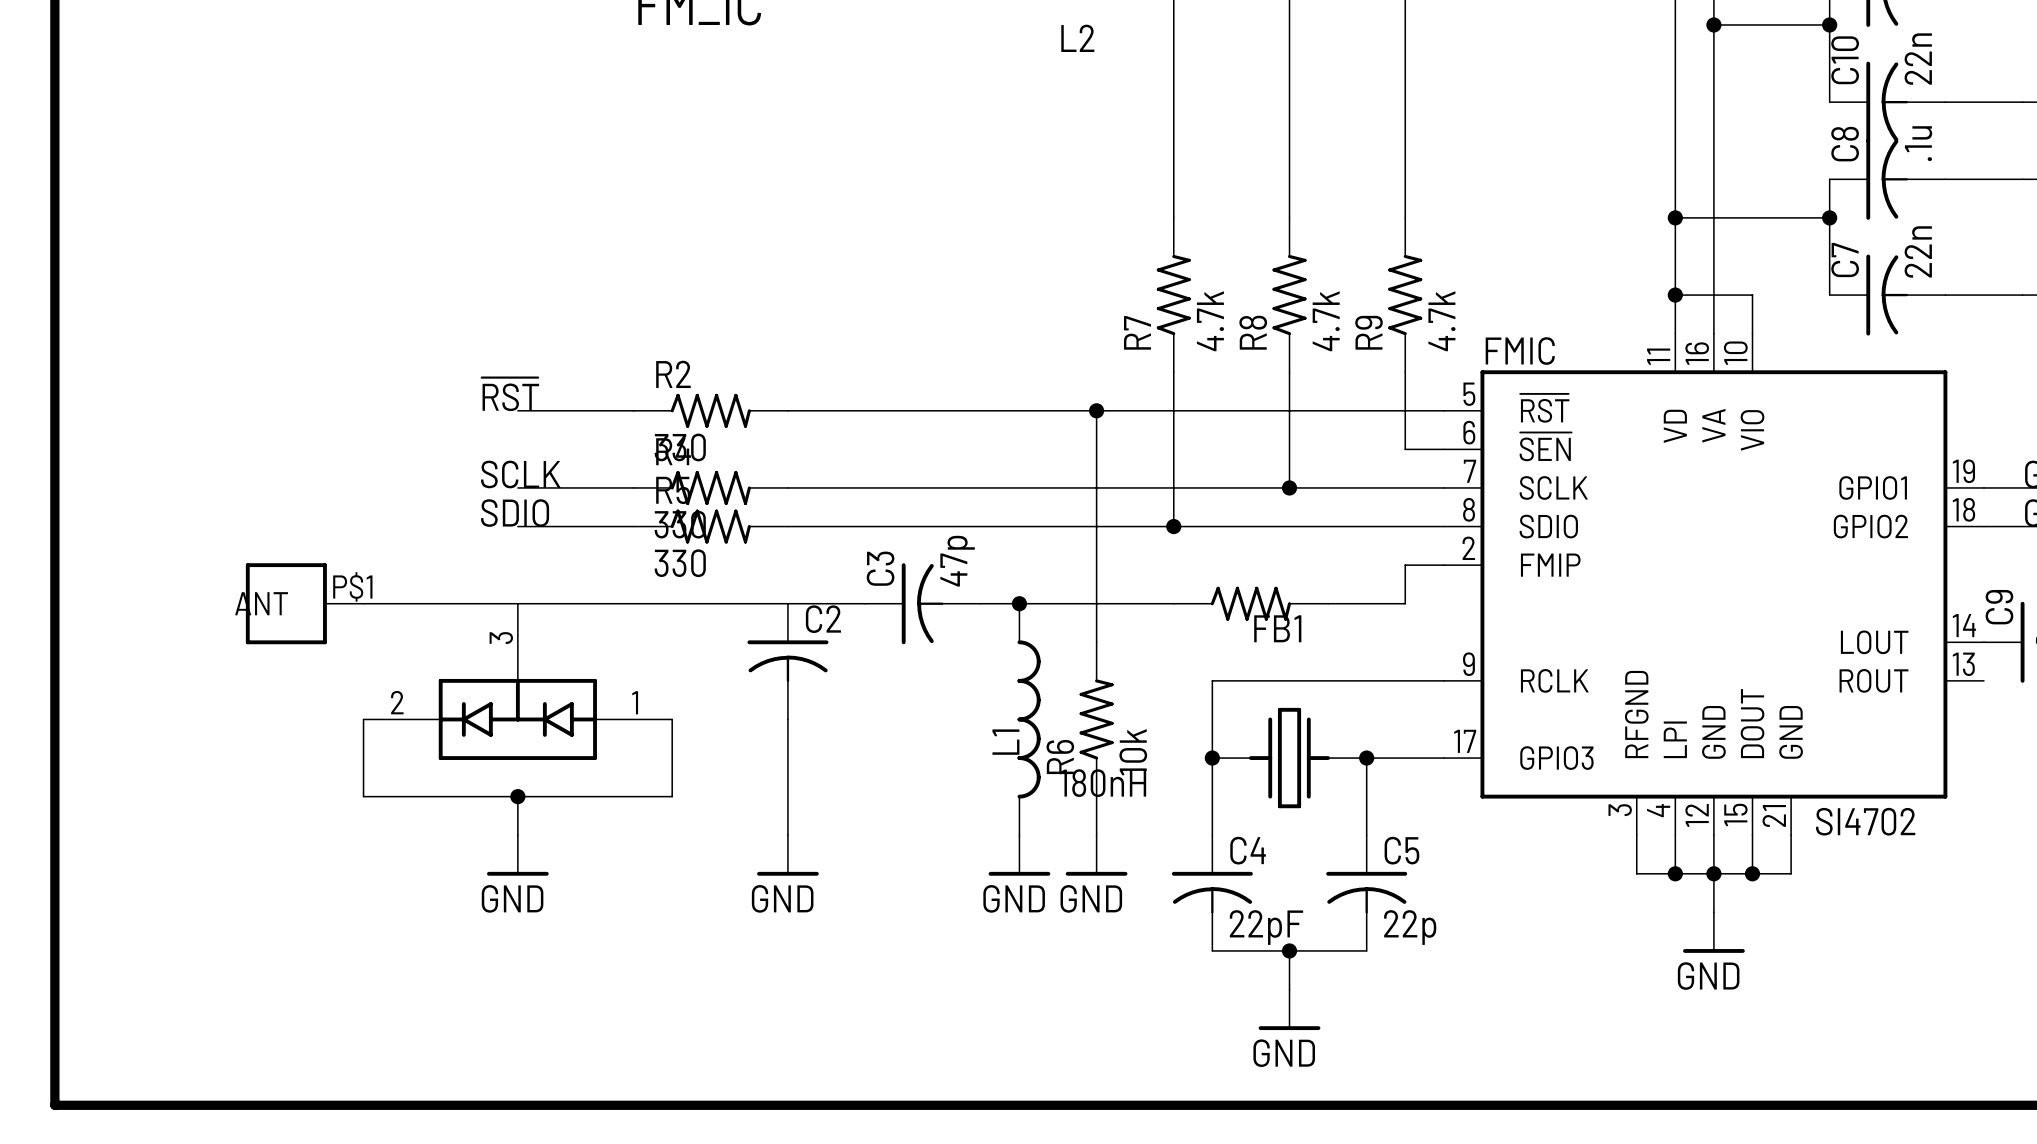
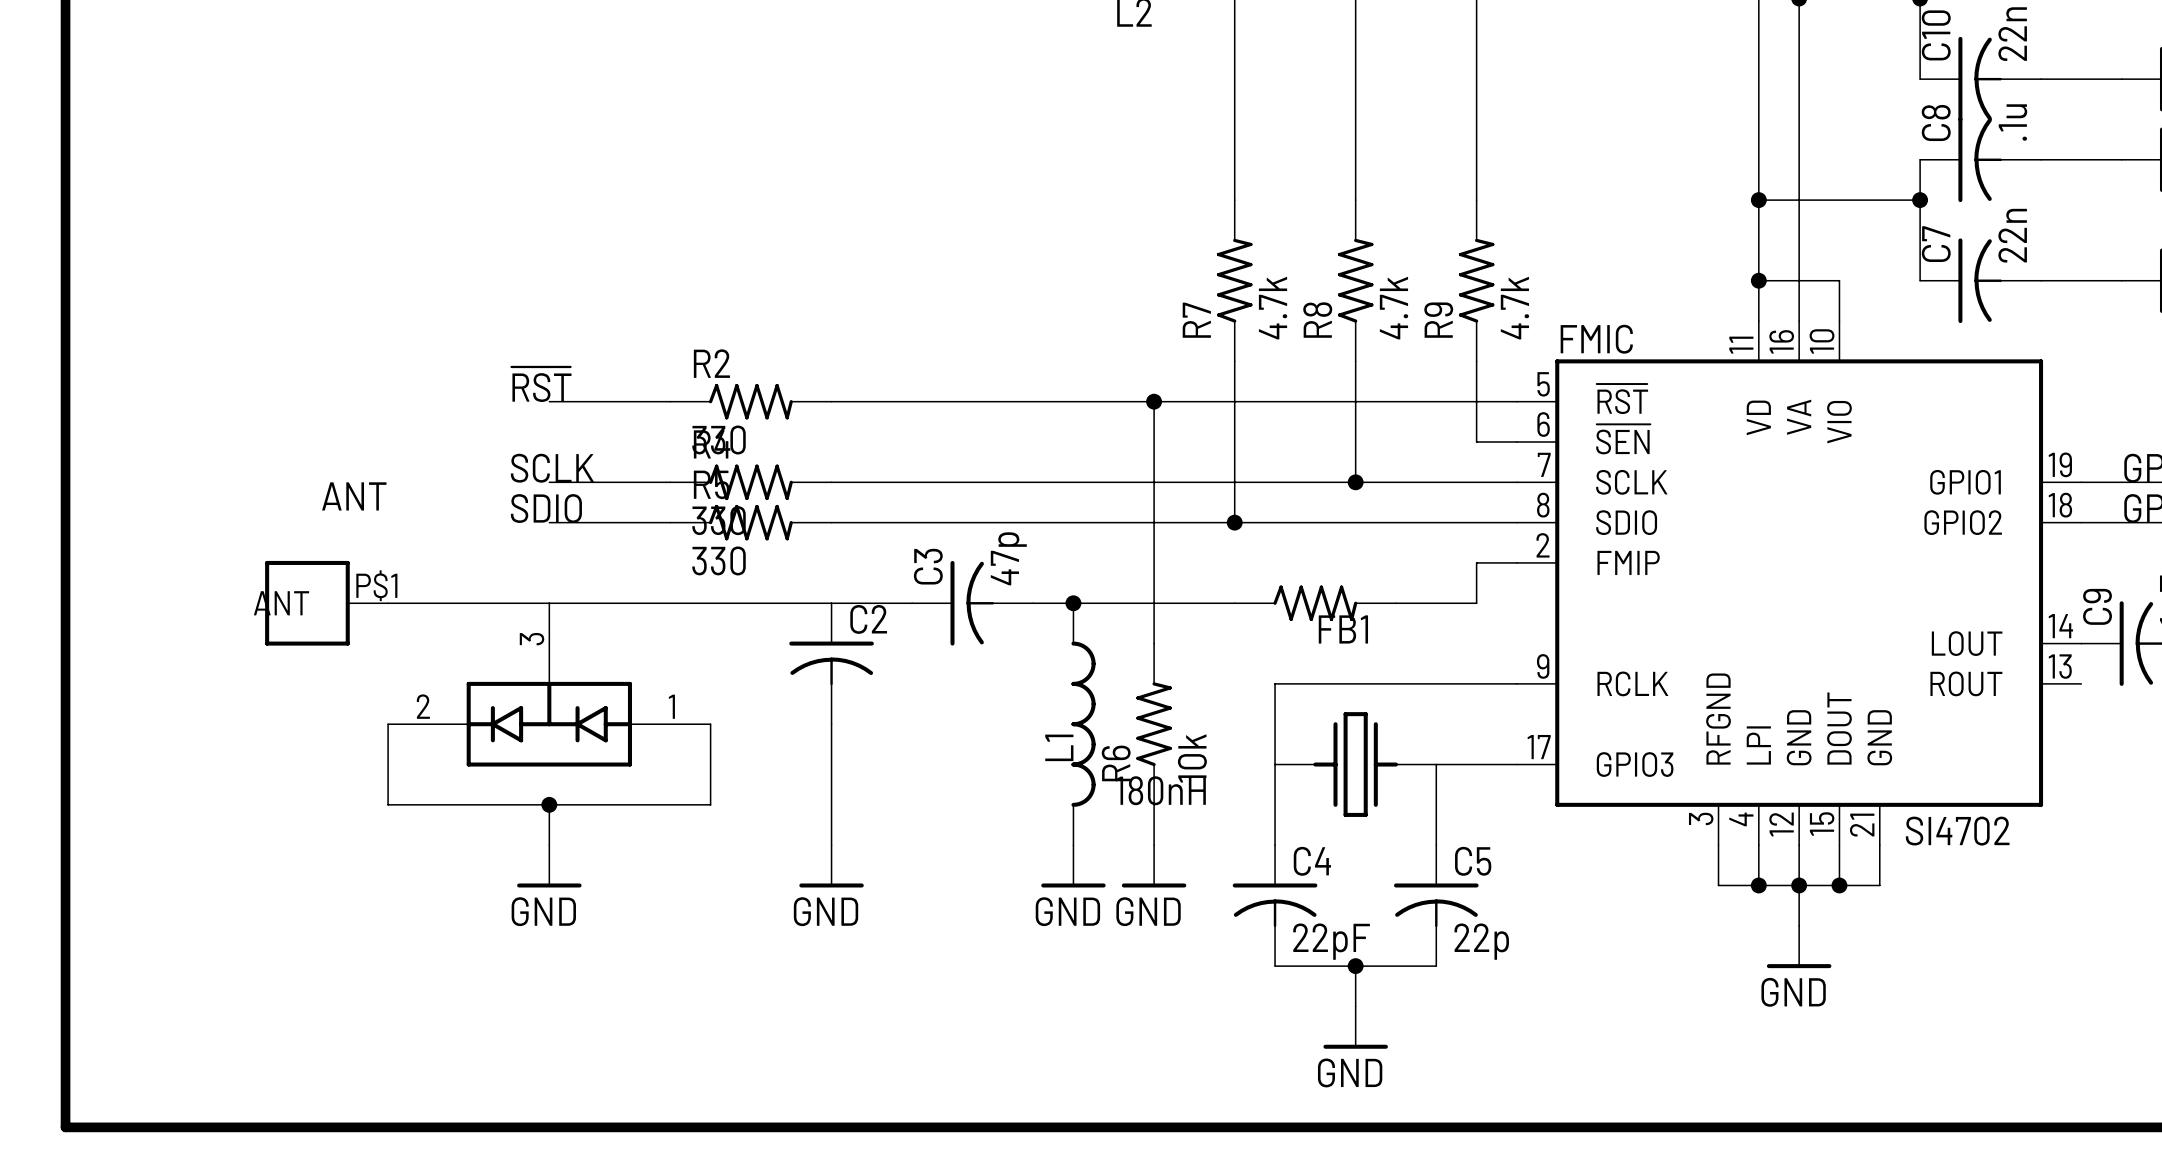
label: none -> ANT (354, 496)
junction: (1212, 758) -> none
junction: (1366, 758) -> none

